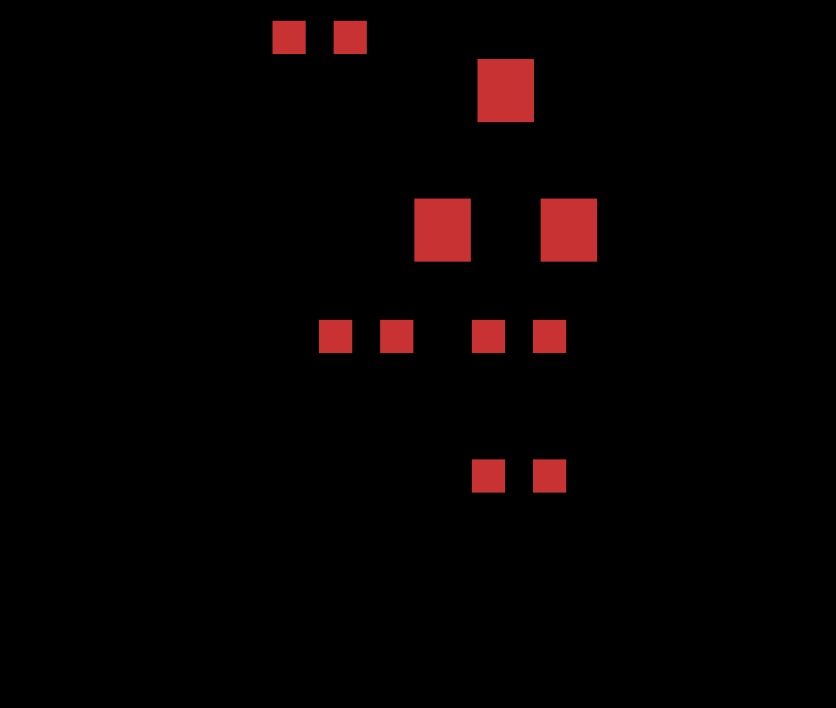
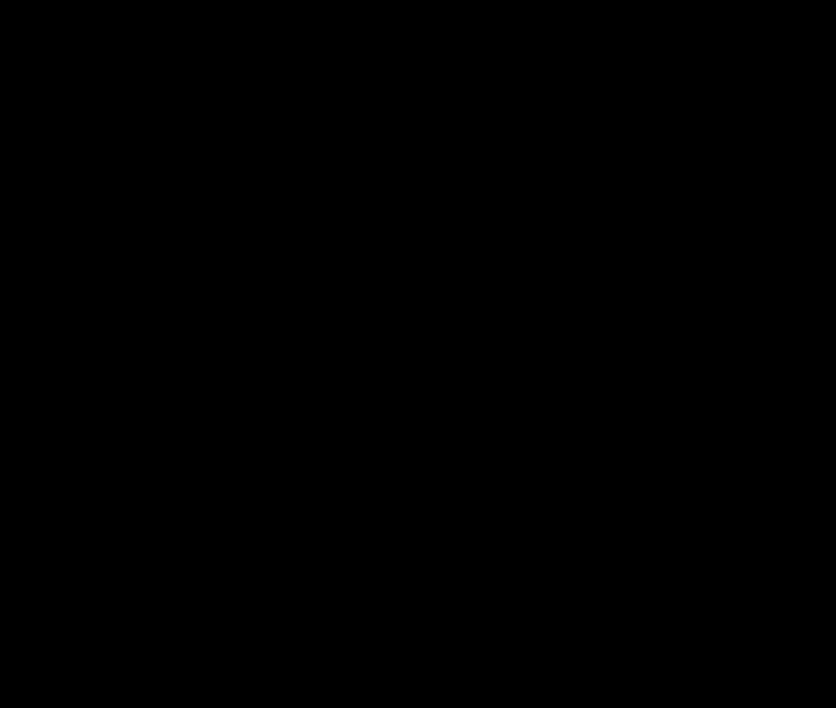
part: (319, 37) -> none
part: (505, 160) -> none
part: (366, 336) -> none
part: (519, 336) -> none
part: (519, 476) -> none

